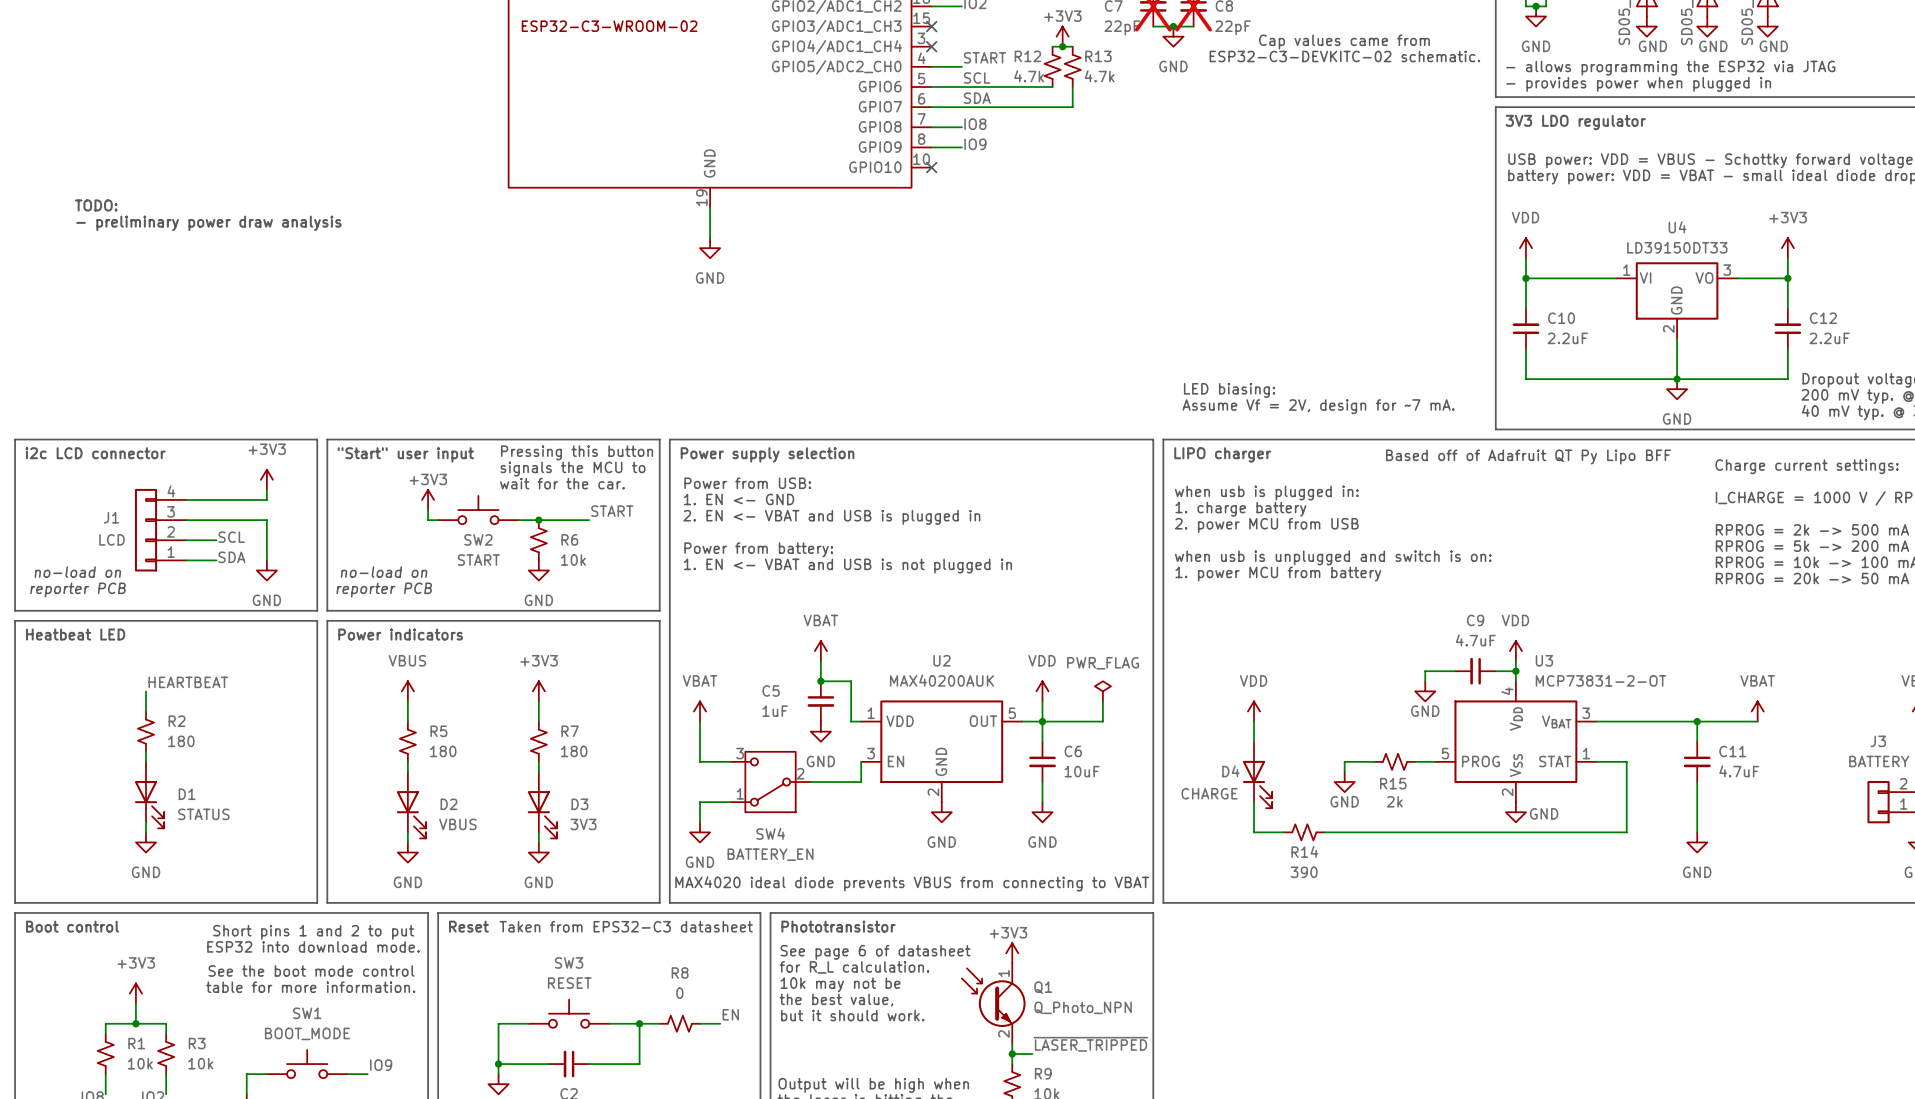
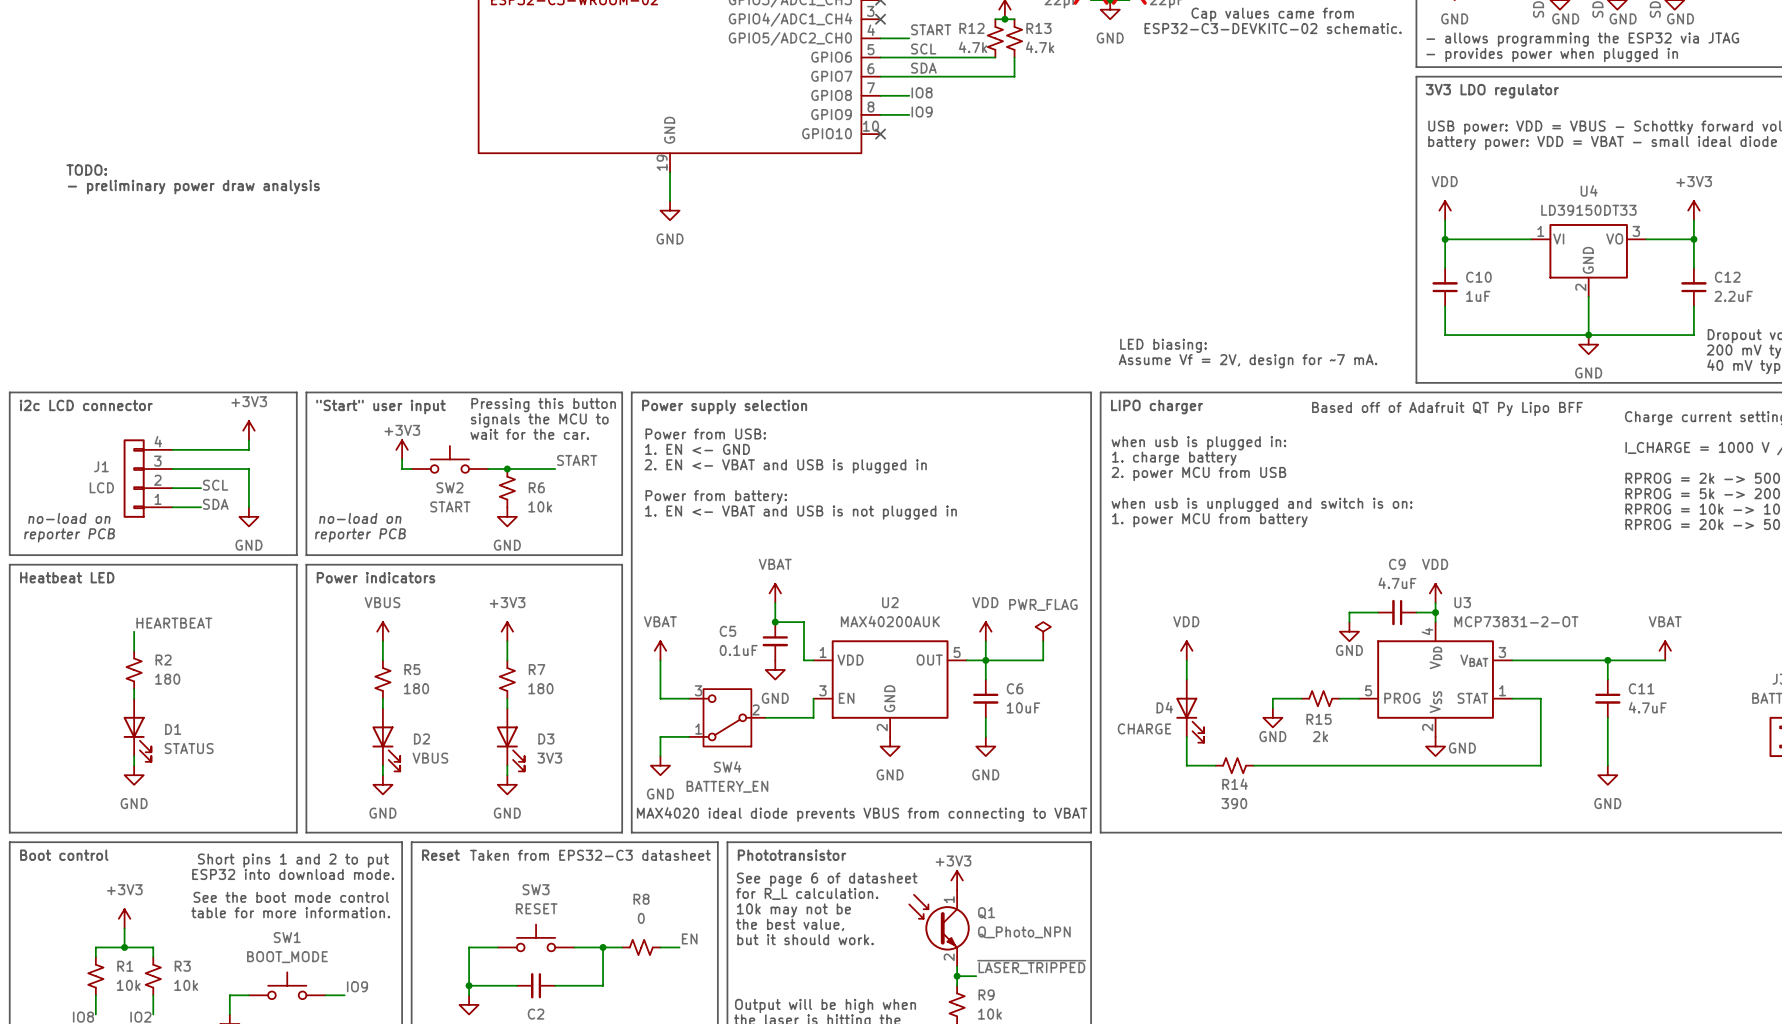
C10 value: 2.2uF (1567, 338) -> 1uF (1478, 296)
C5 value: 1uF (775, 711) -> 0.1uF (738, 650)

